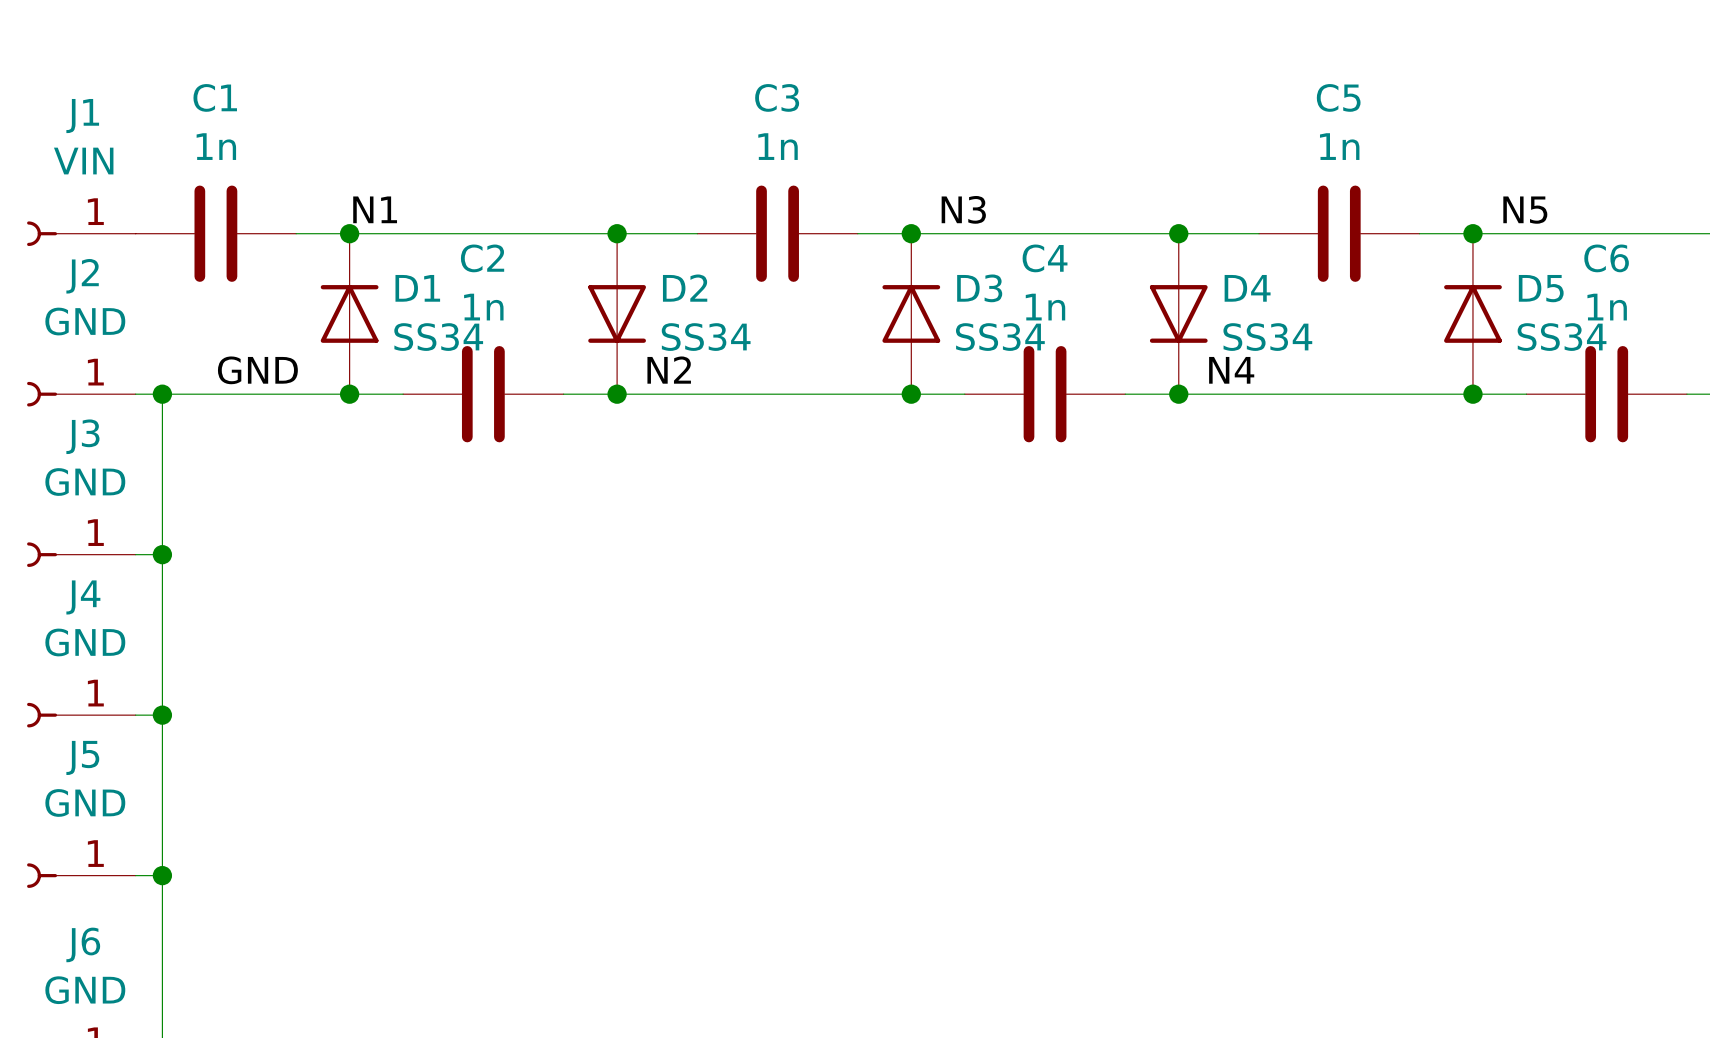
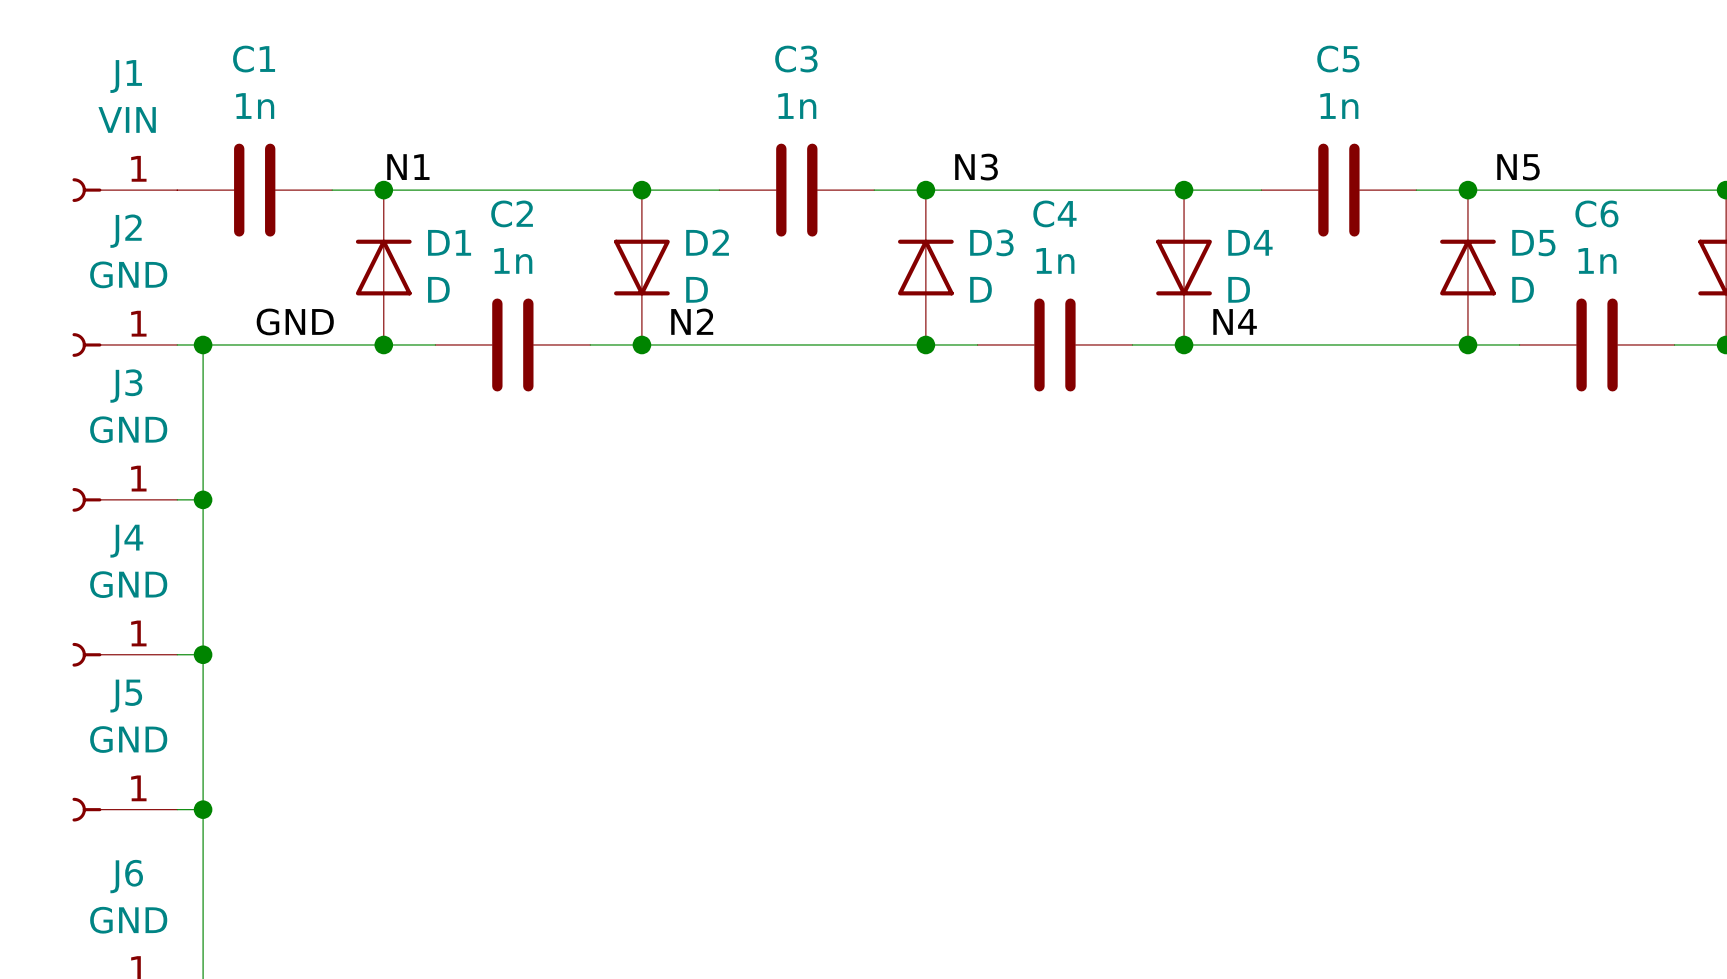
D1 value: SS34 (438, 337) -> D (438, 289)
D2 value: SS34 (706, 337) -> D (697, 289)
D3 value: SS34 (1000, 337) -> D (980, 289)
D4 value: SS34 (1267, 337) -> D (1239, 289)
D5 value: SS34 (1562, 337) -> D (1523, 289)

